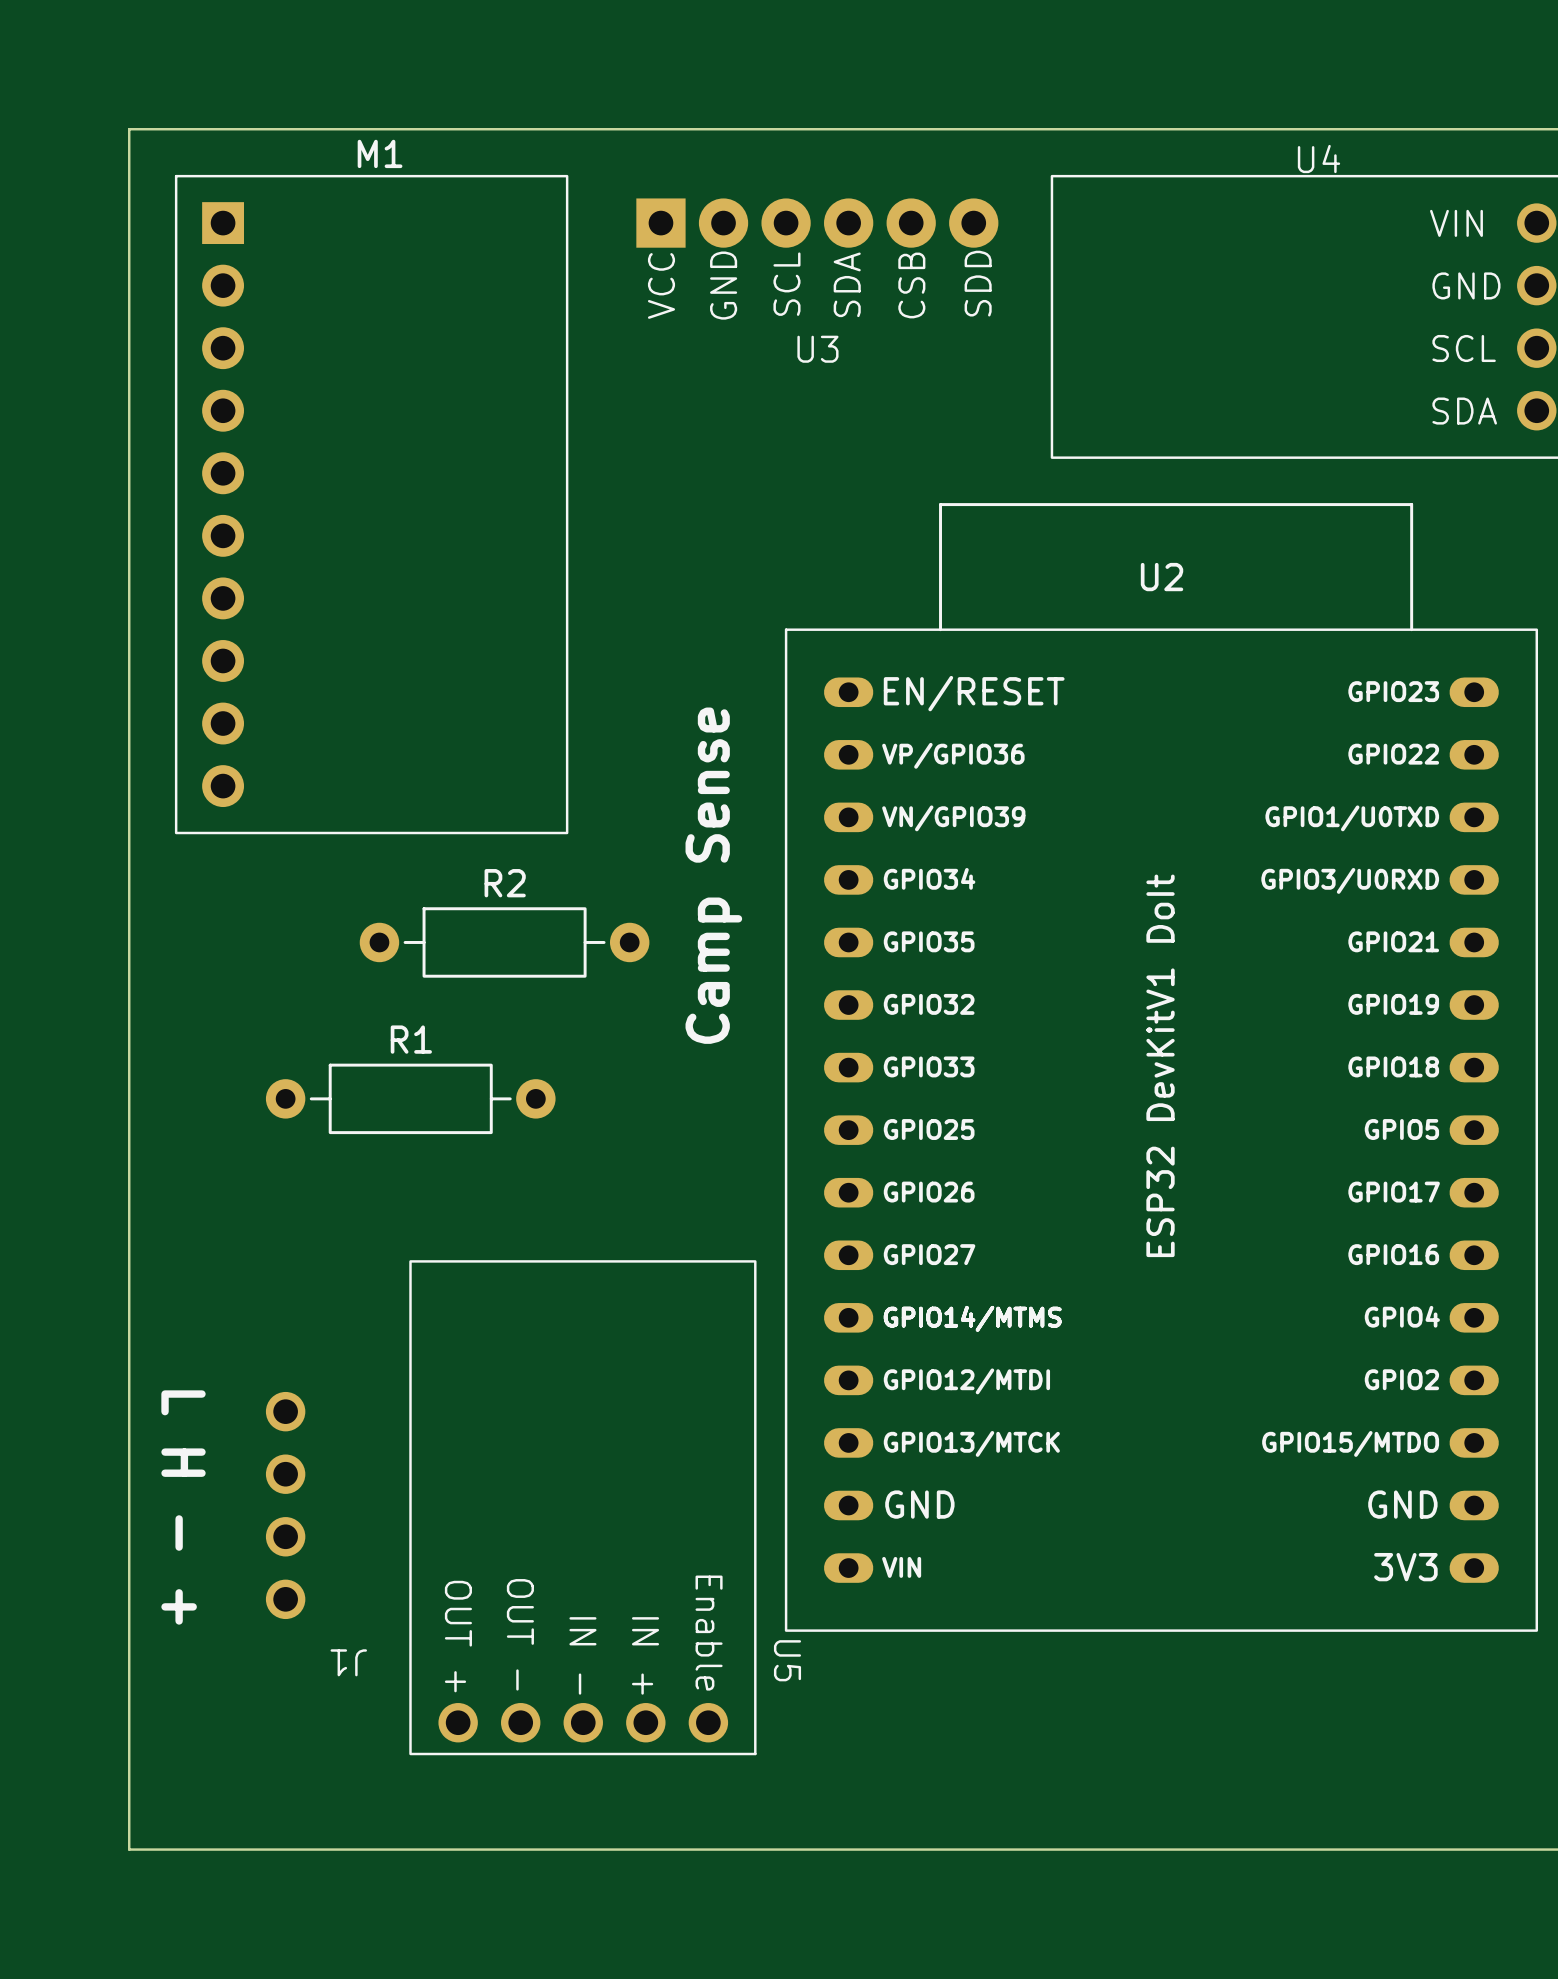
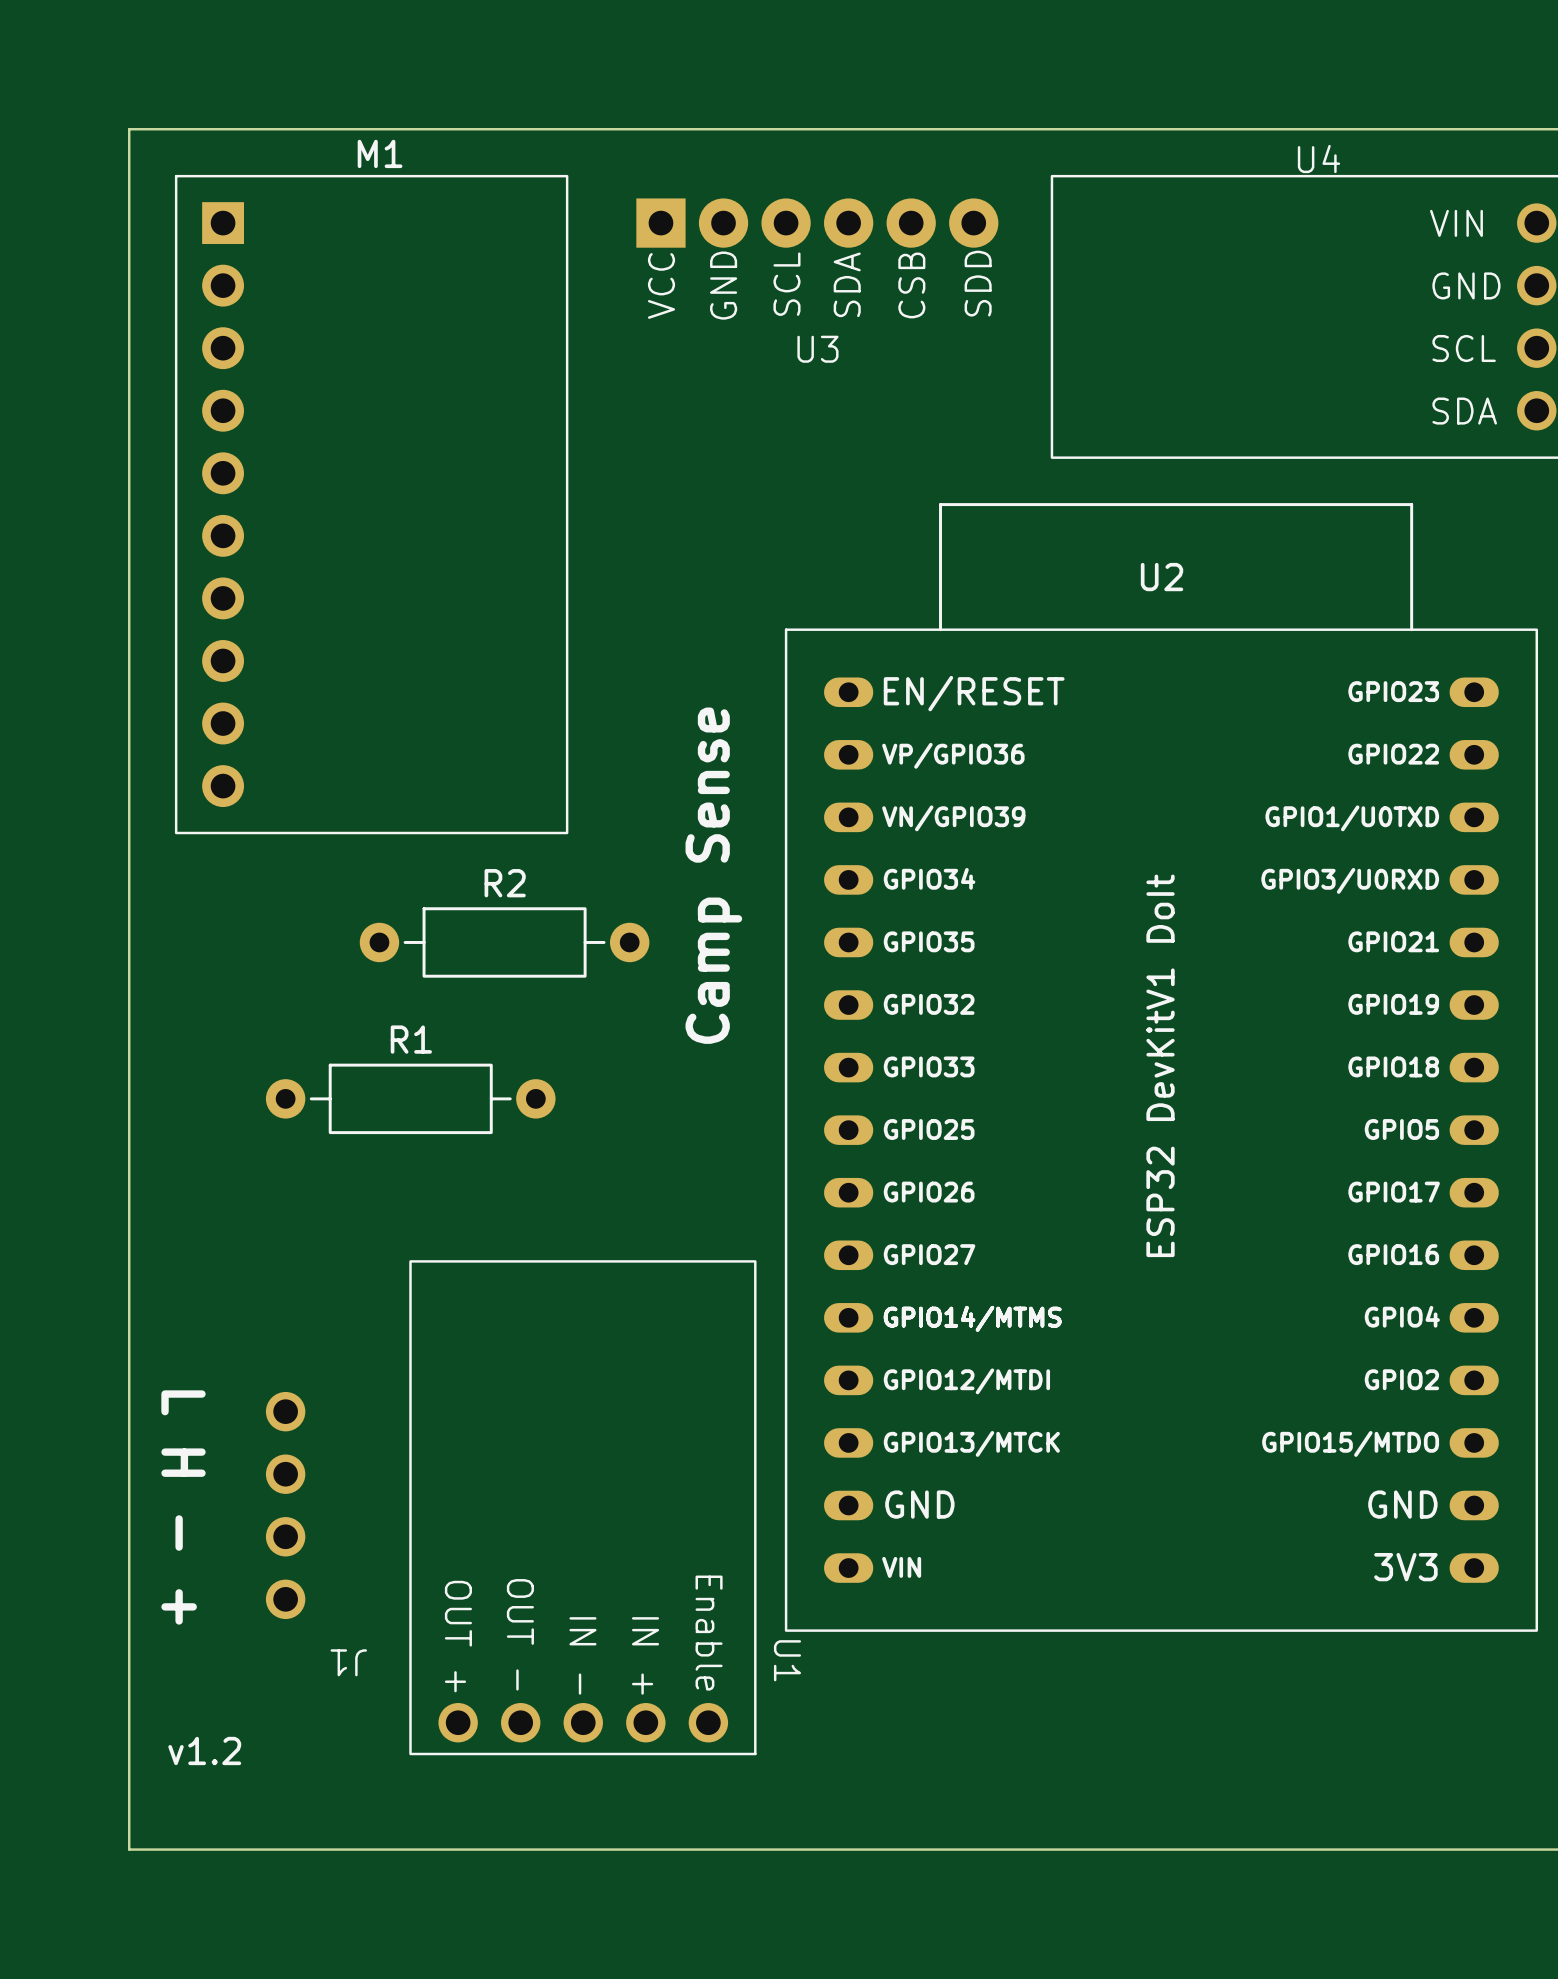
U5 name: U5 (787, 1660) -> U1 (787, 1660)
text: none -> v1.2 (204, 1750)

